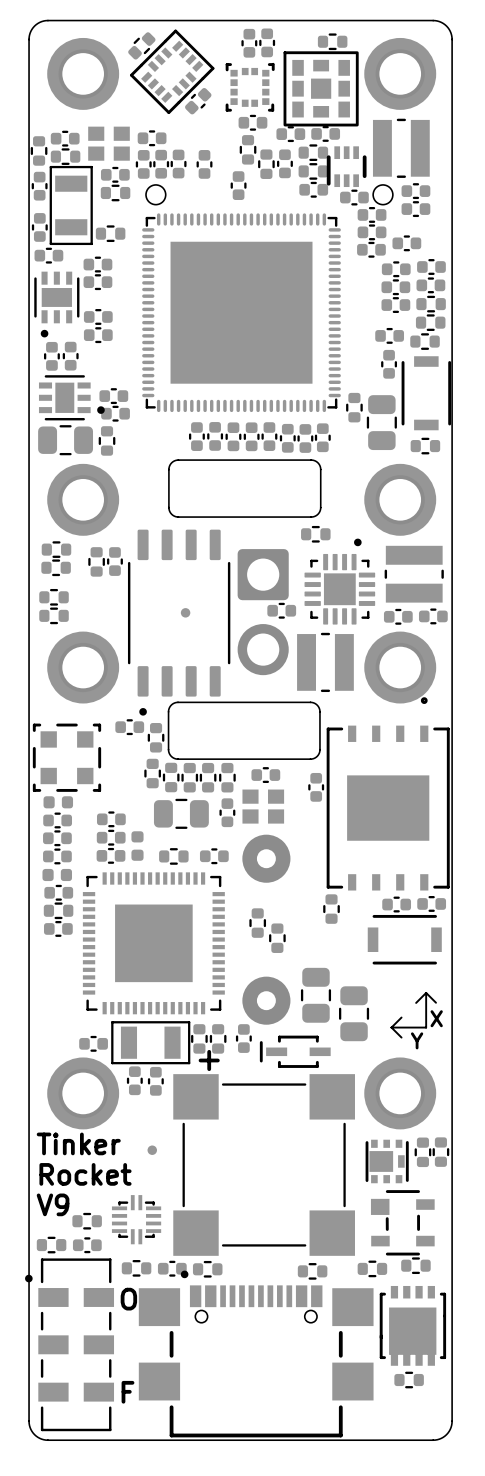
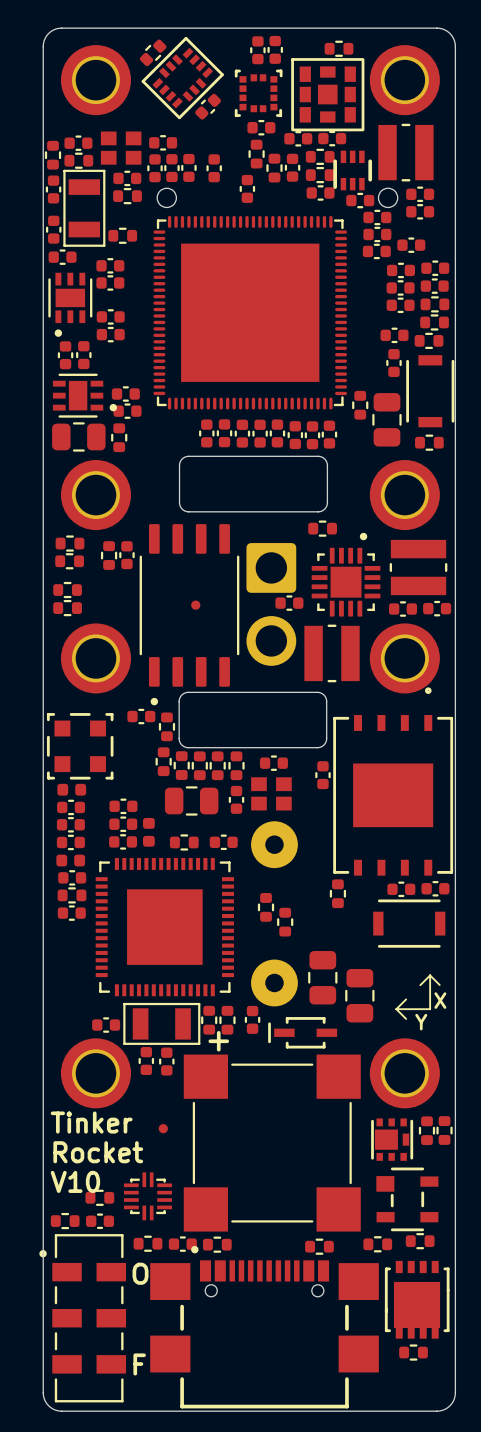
text: V9 (53, 1204) -> V10 (75, 1181)

